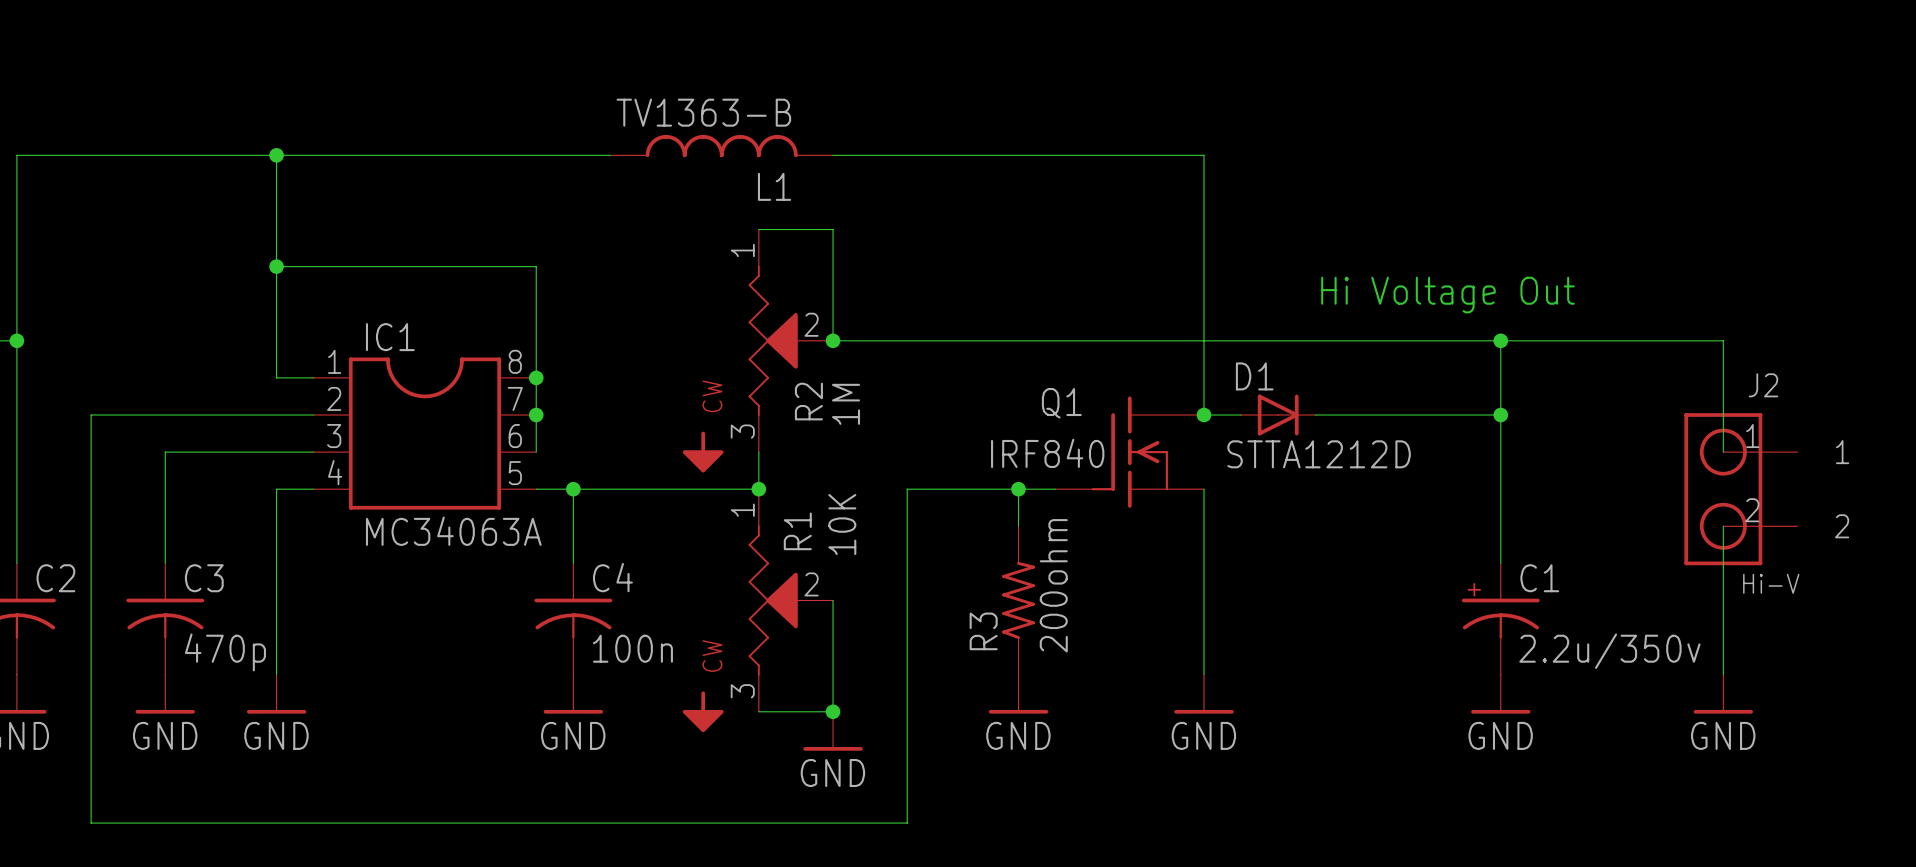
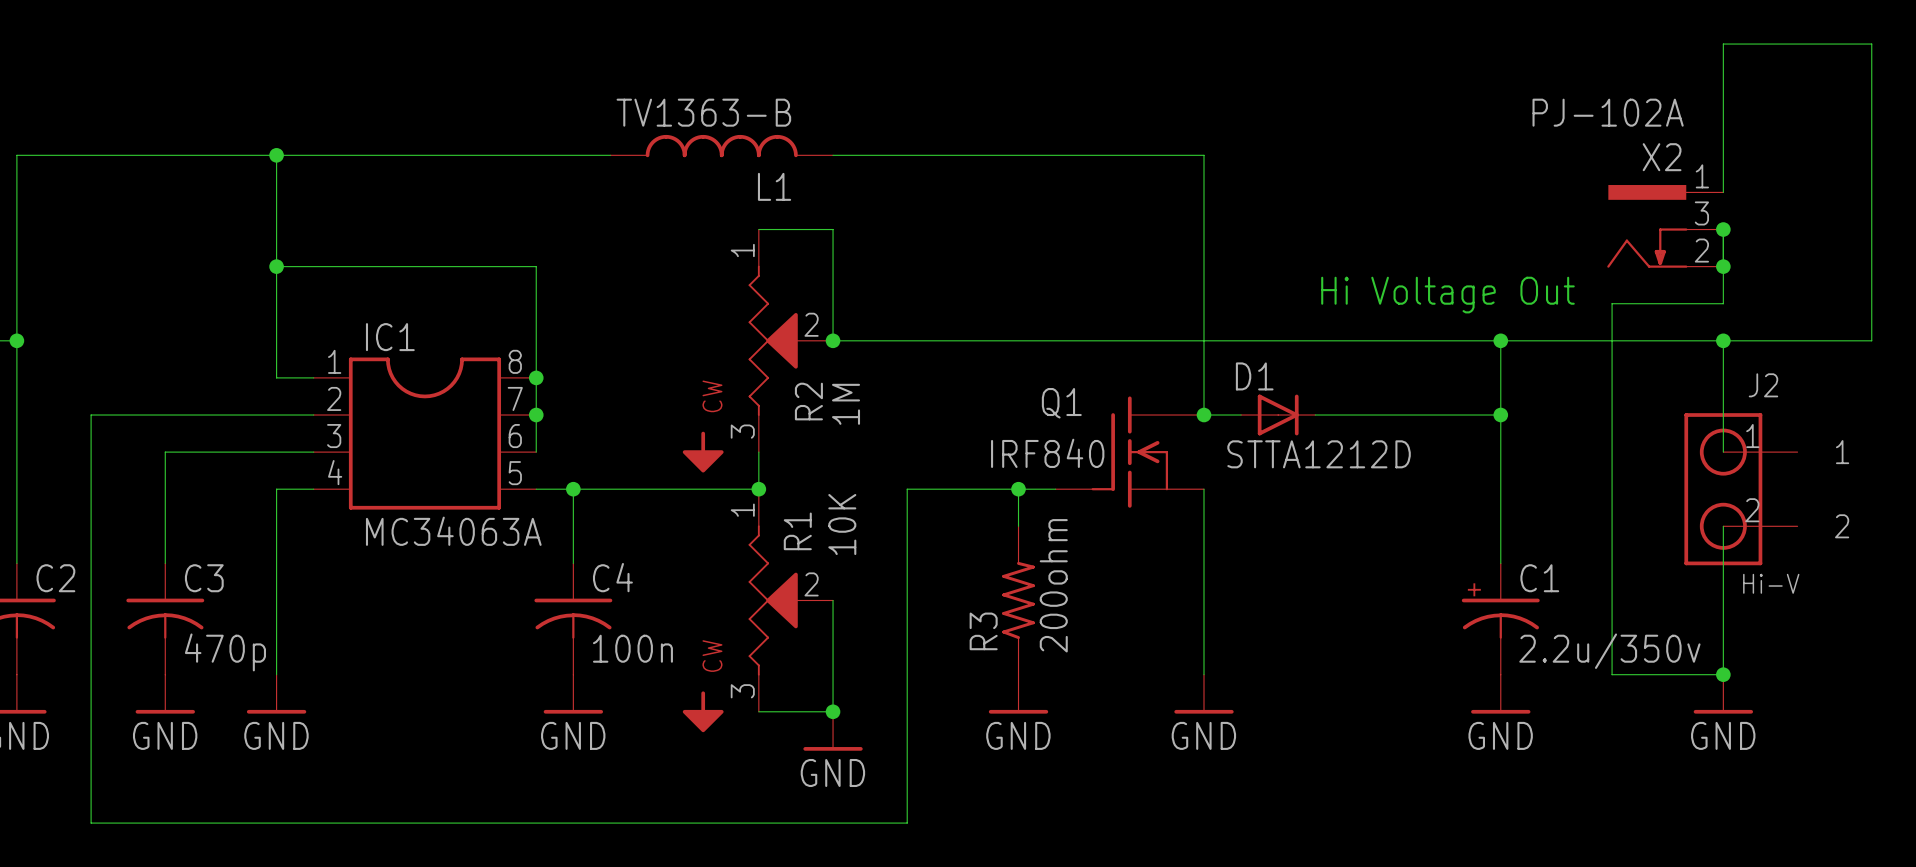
wire: none -> (1723, 192) (1723, 44) (1871, 44) (1871, 340) (1723, 340)
X2: none -> PJ-102A (1665, 226)
wire: none -> (1723, 229) (1723, 303) (1612, 303) (1612, 674) (1723, 674)
junction: none -> (1723, 229)
junction: none -> (1723, 266)
junction: none -> (1723, 340)
junction: none -> (1723, 674)

